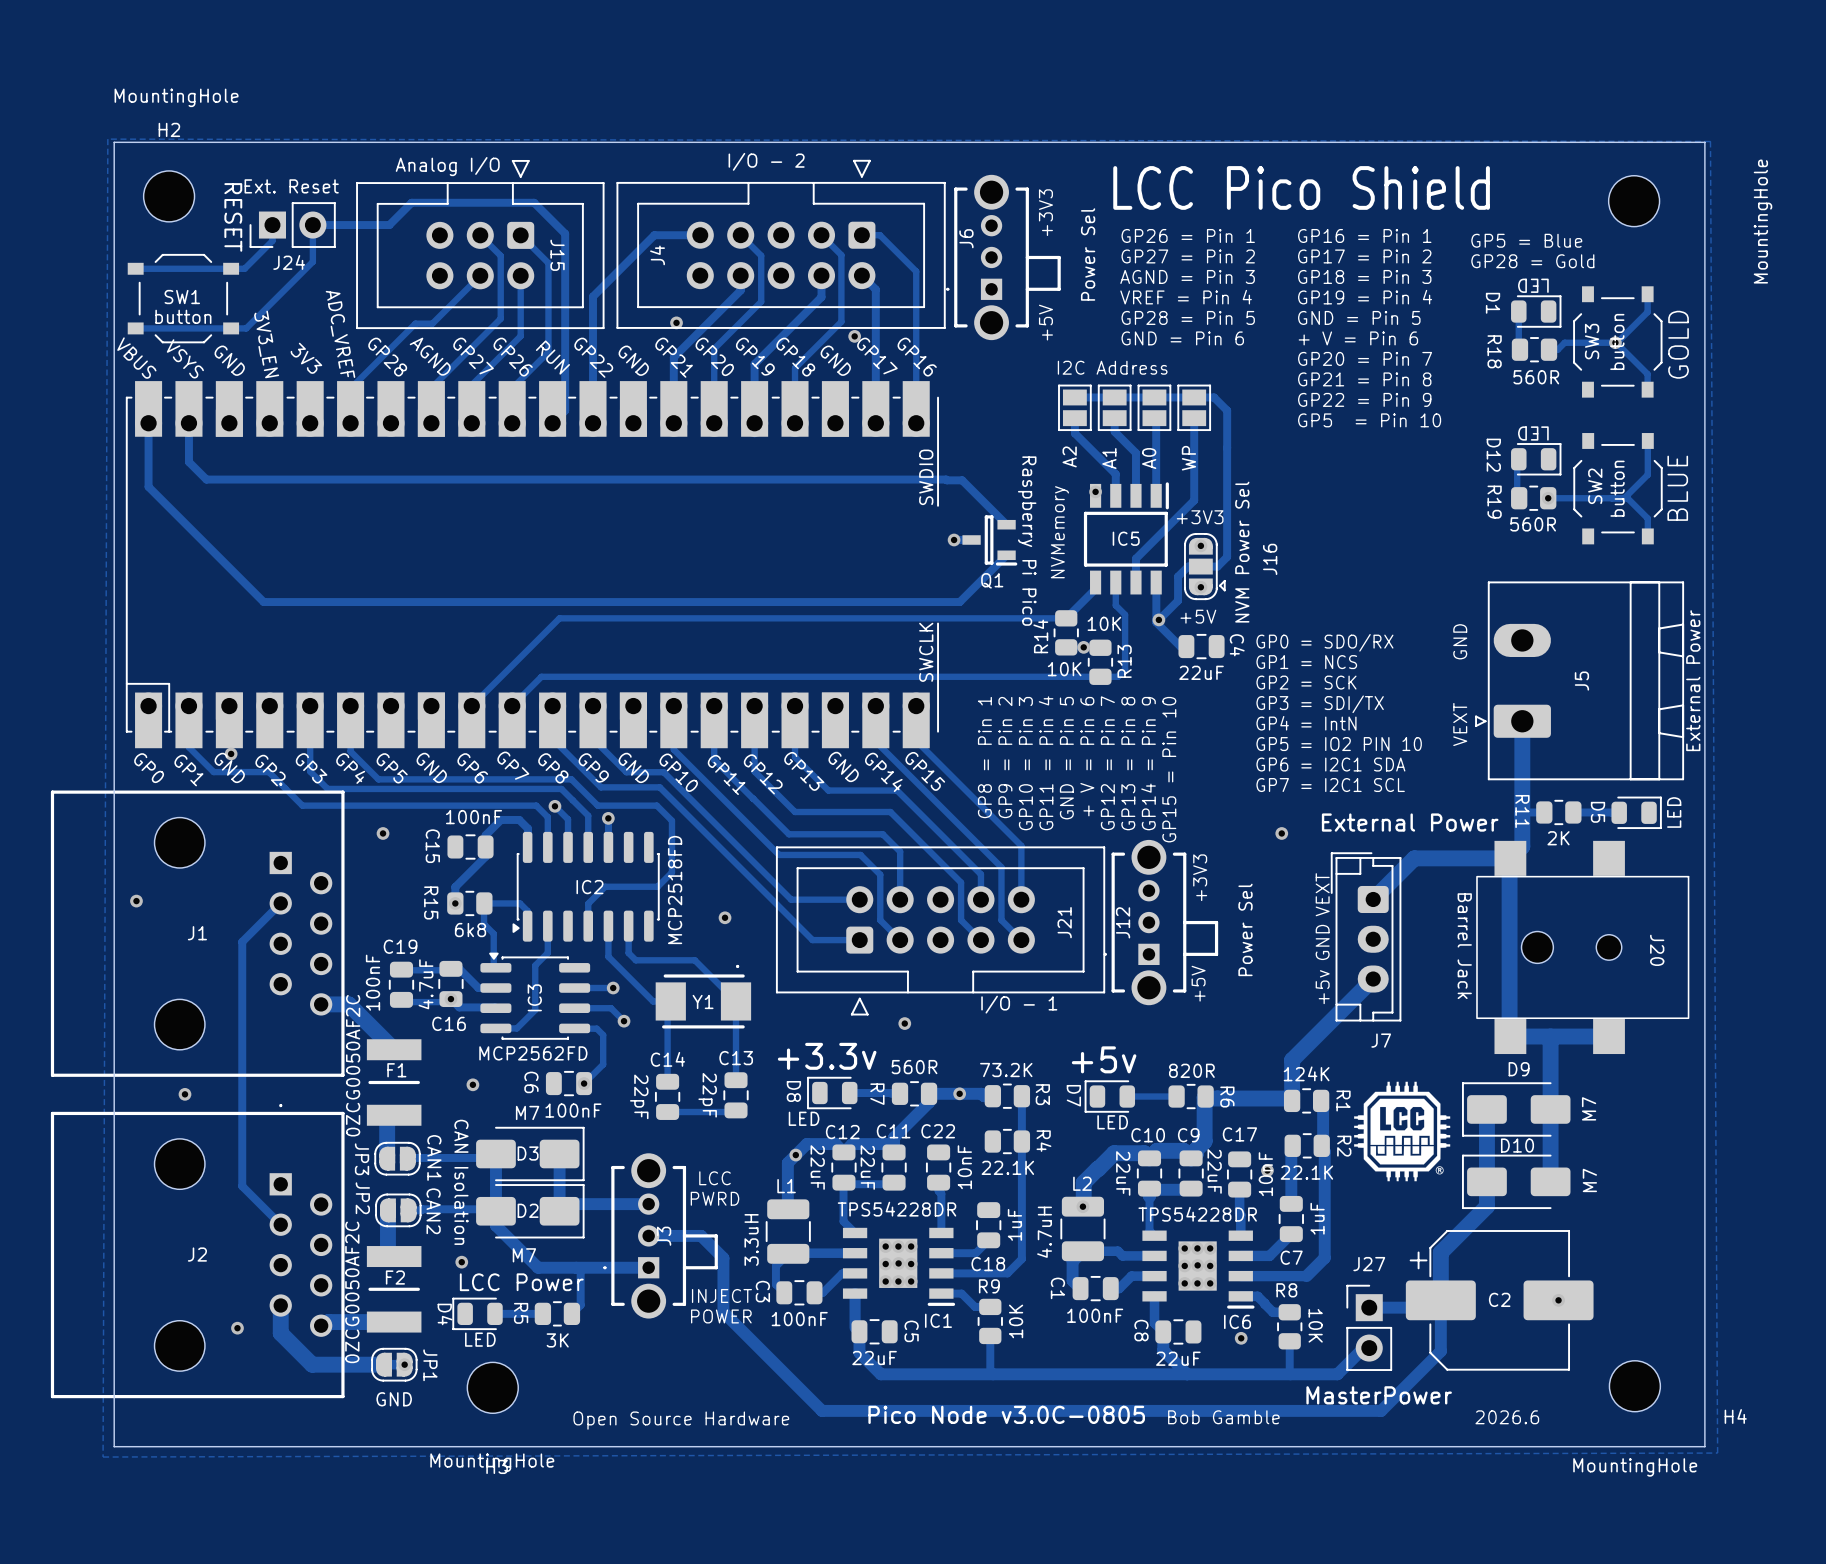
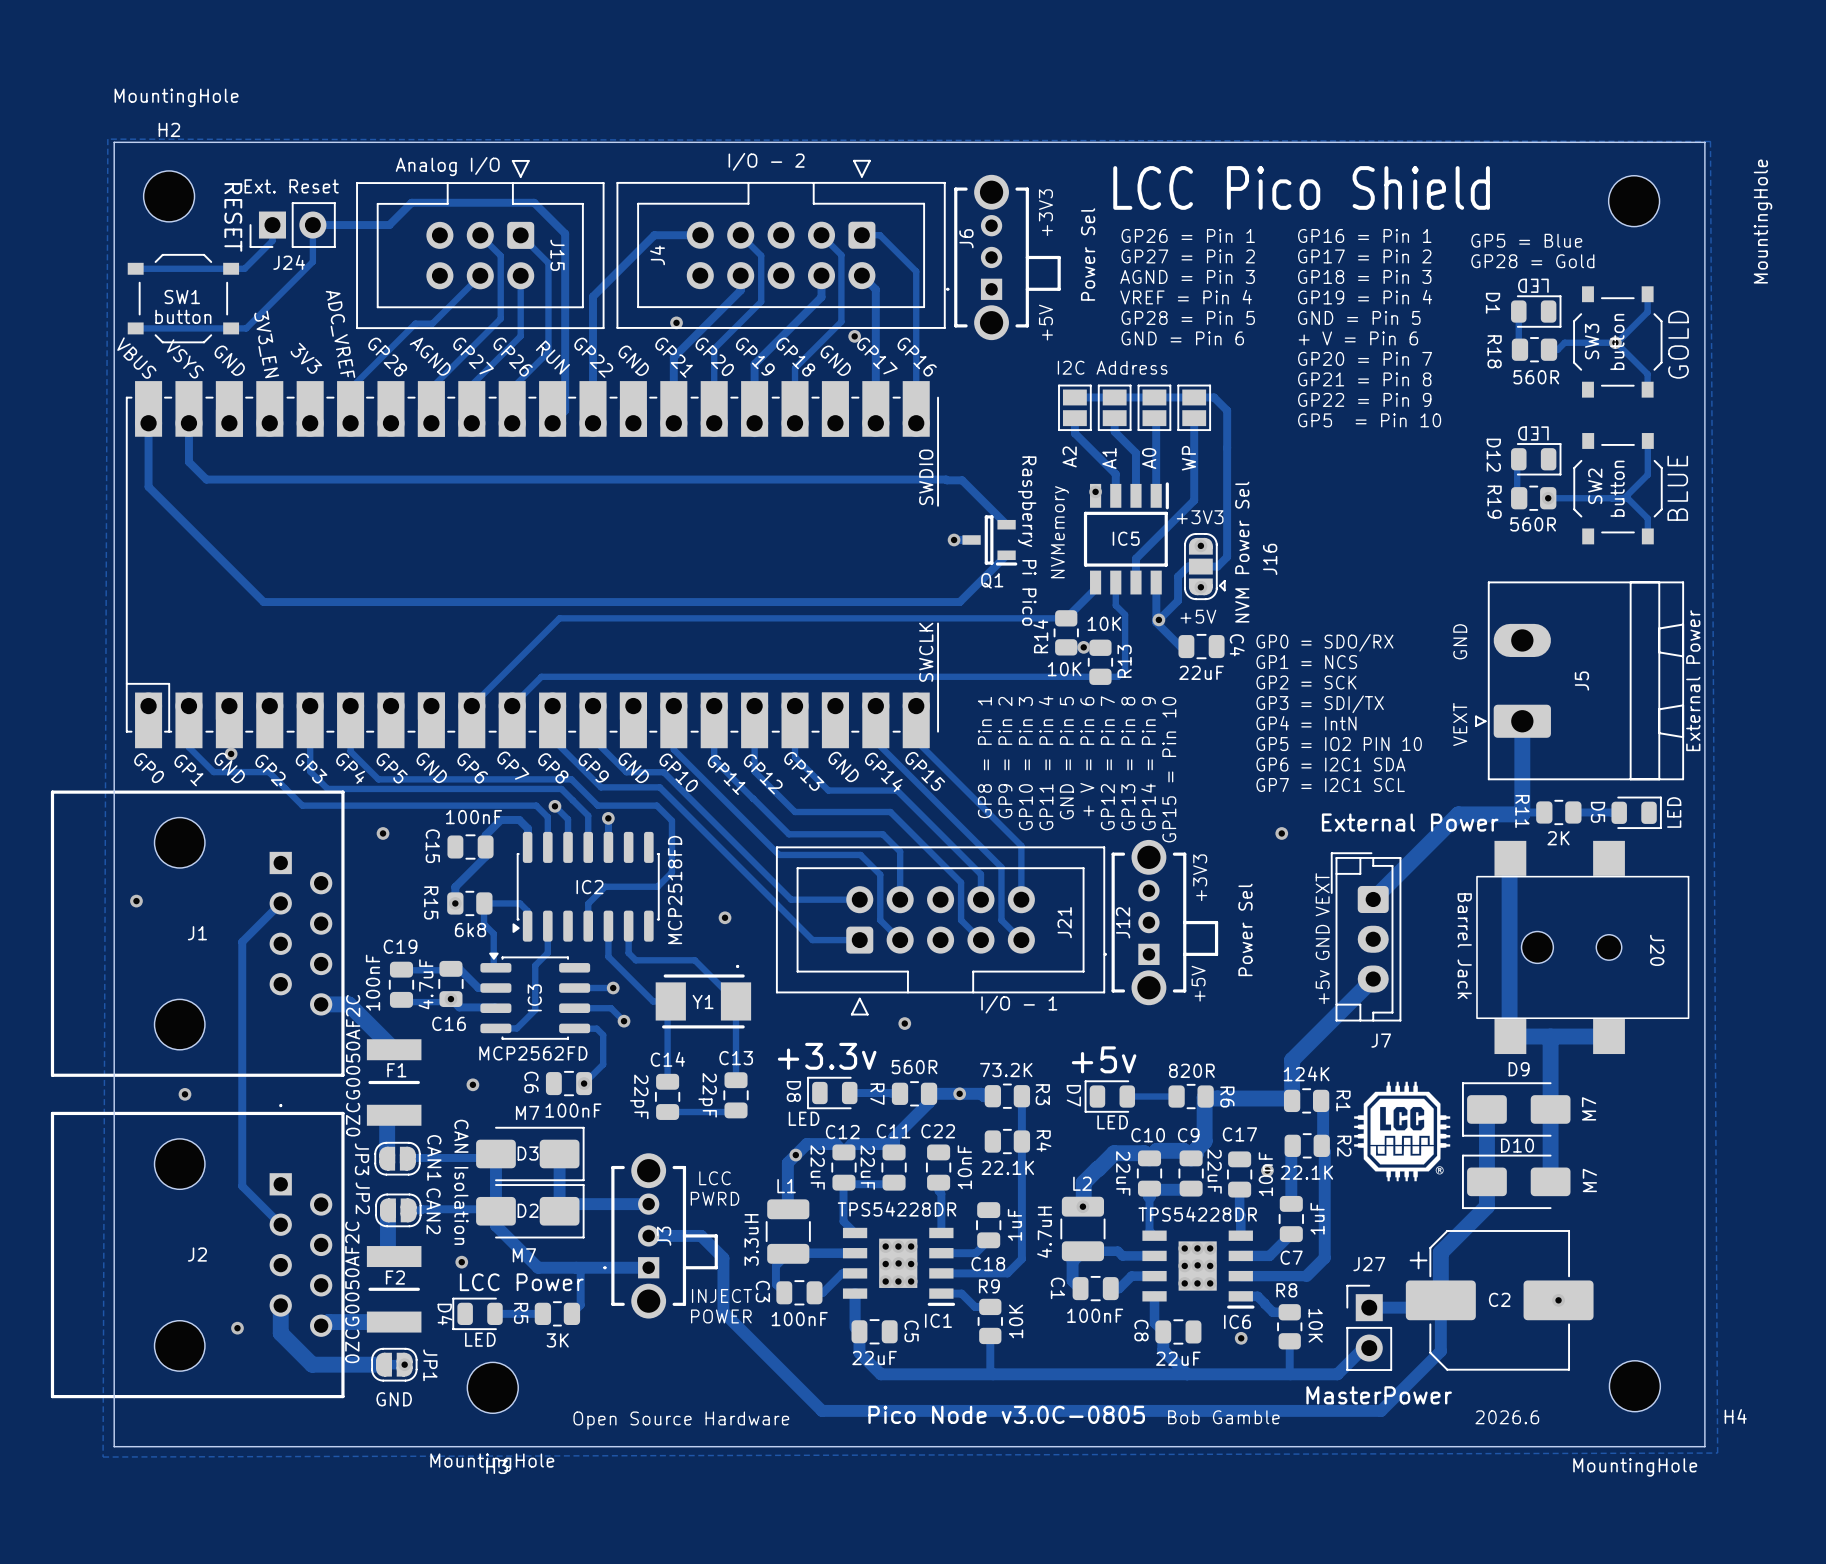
track: (1522, 814) (1522, 846) (1510, 858) (1414, 858) -> (1522, 814) (1458, 814) (1414, 858)

